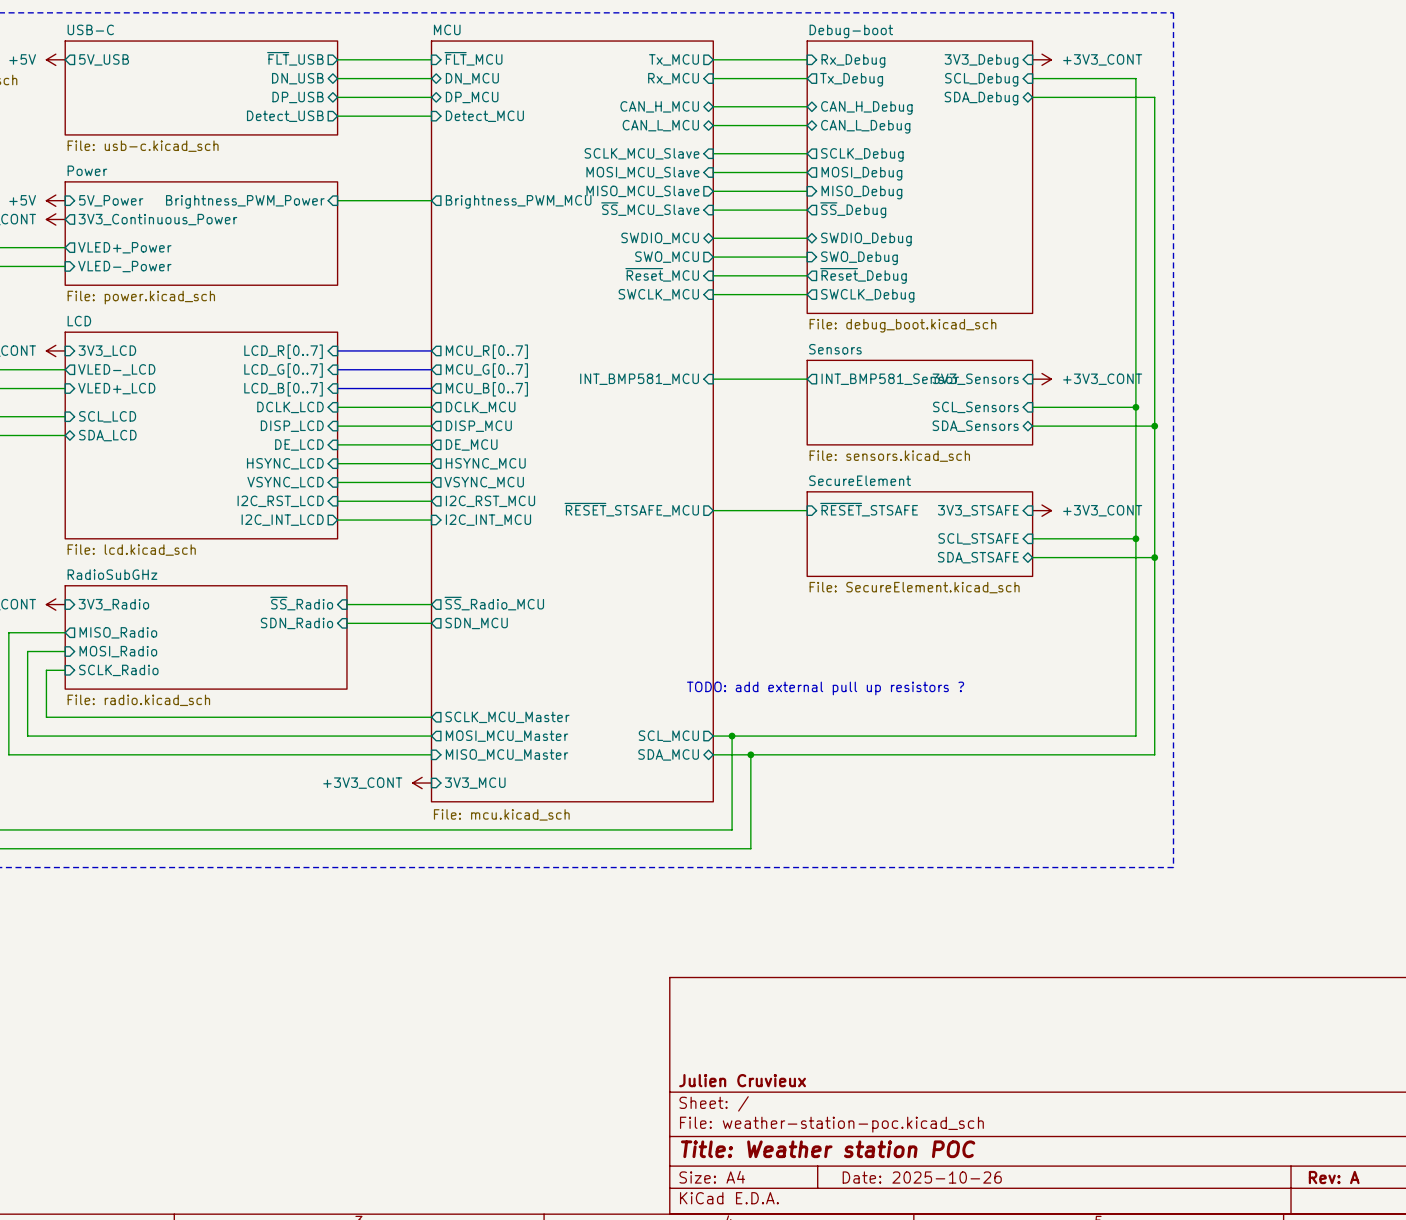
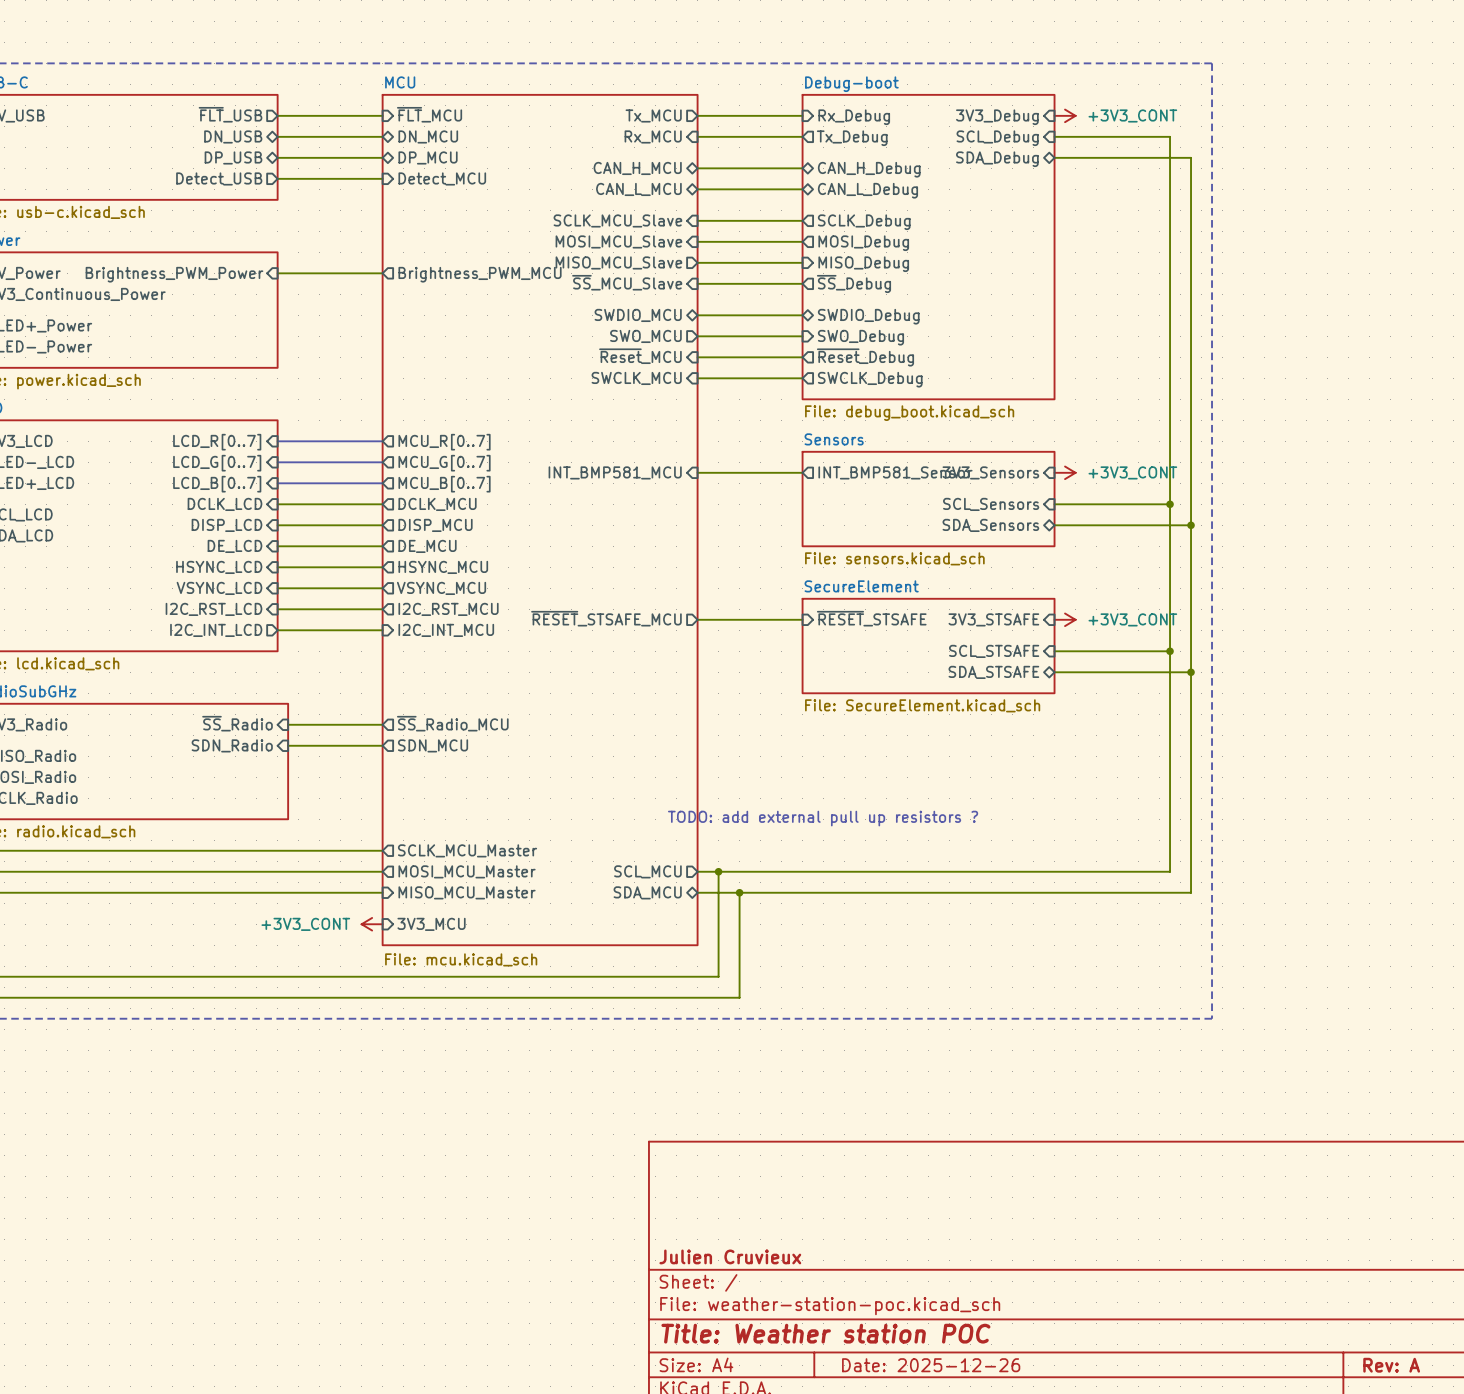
title block: Date: 2025-10-26 (922, 1177) -> Date: 2025-12-26 (931, 1365)

